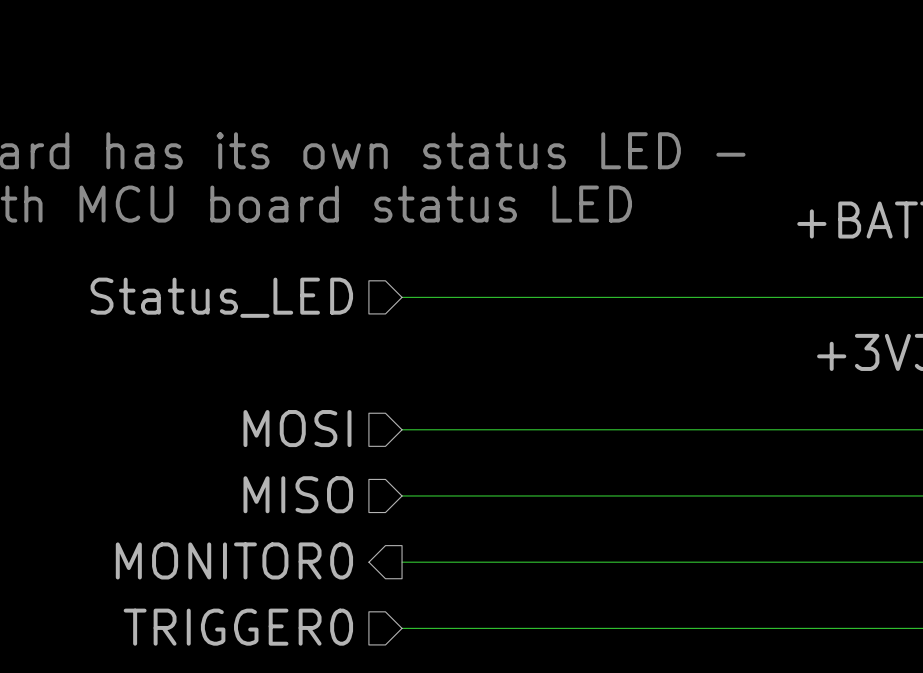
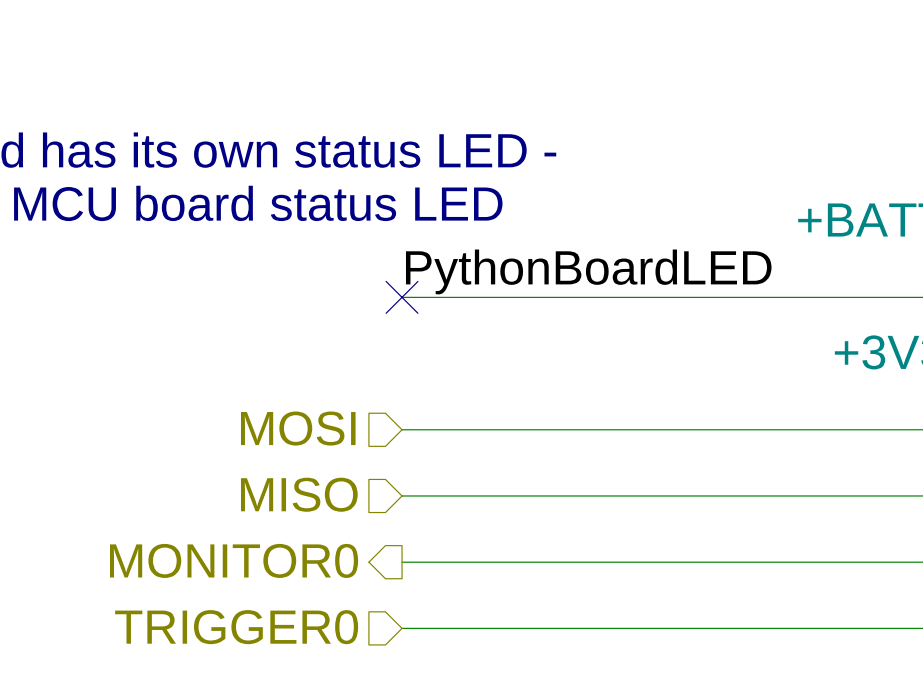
label: none -> PythonBoardLED (588, 271)
hierarchical label: Status_LED (221, 297) -> none
no-connect mark: none -> (402, 297)

